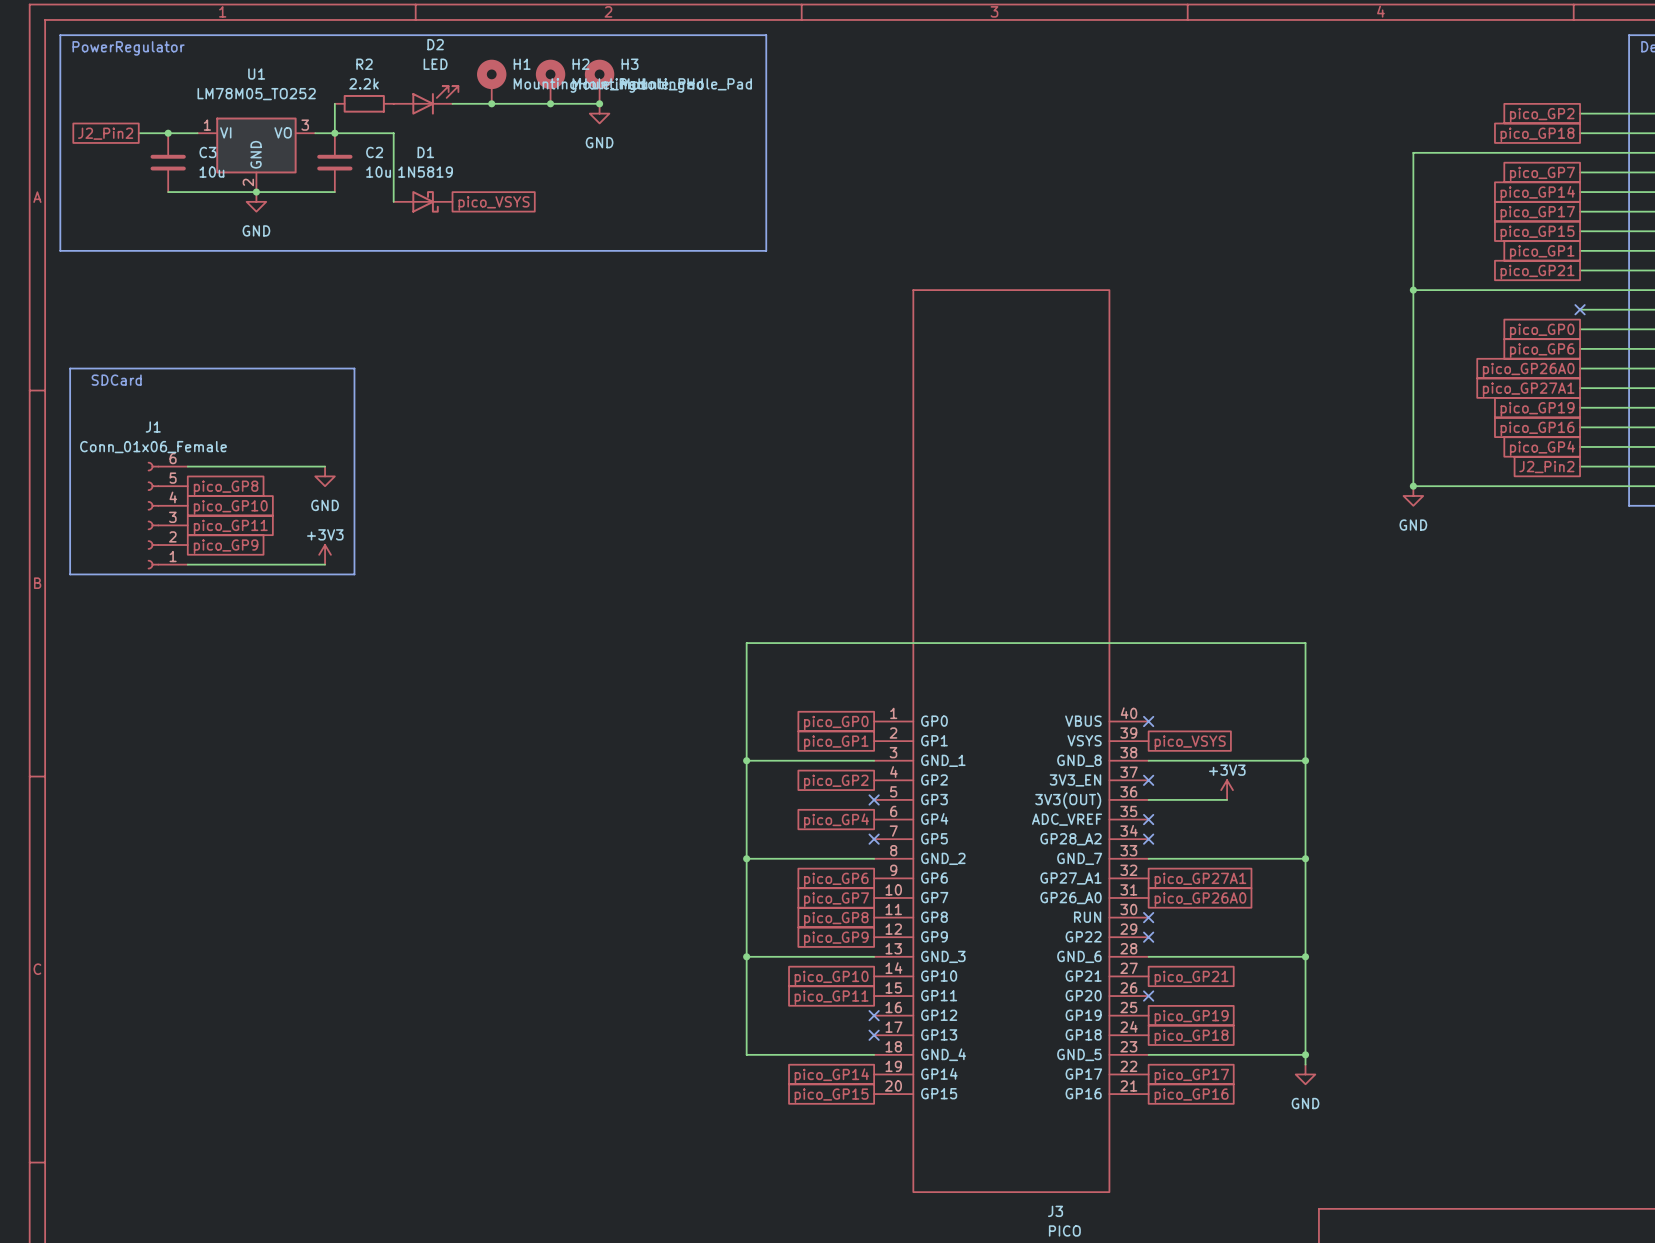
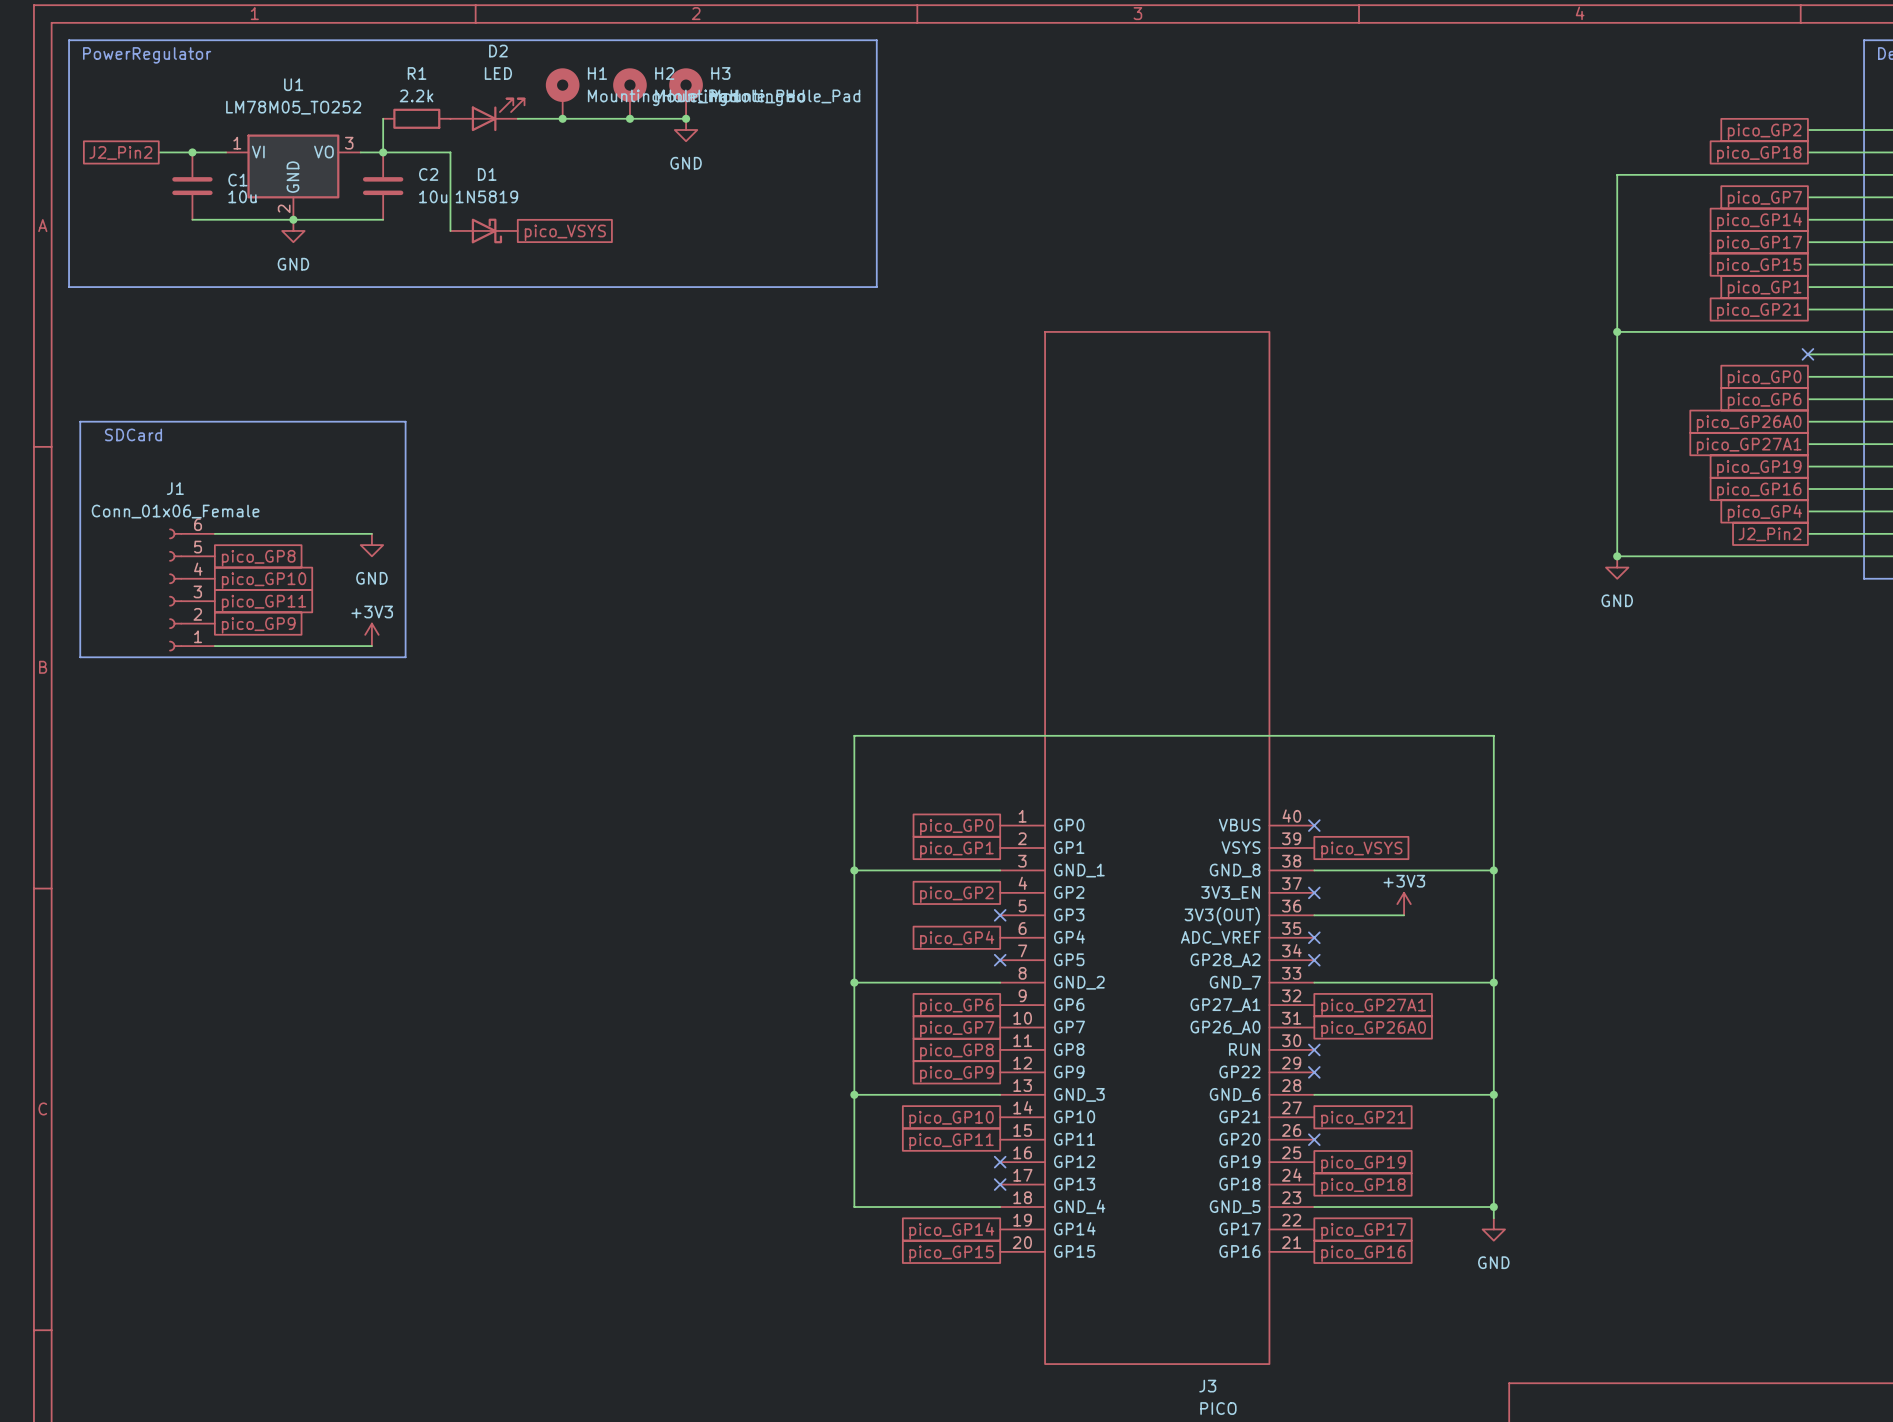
R2 name: R2 (364, 64) -> R1 (417, 73)
C3 name: C3 (207, 152) -> C1 (237, 180)

